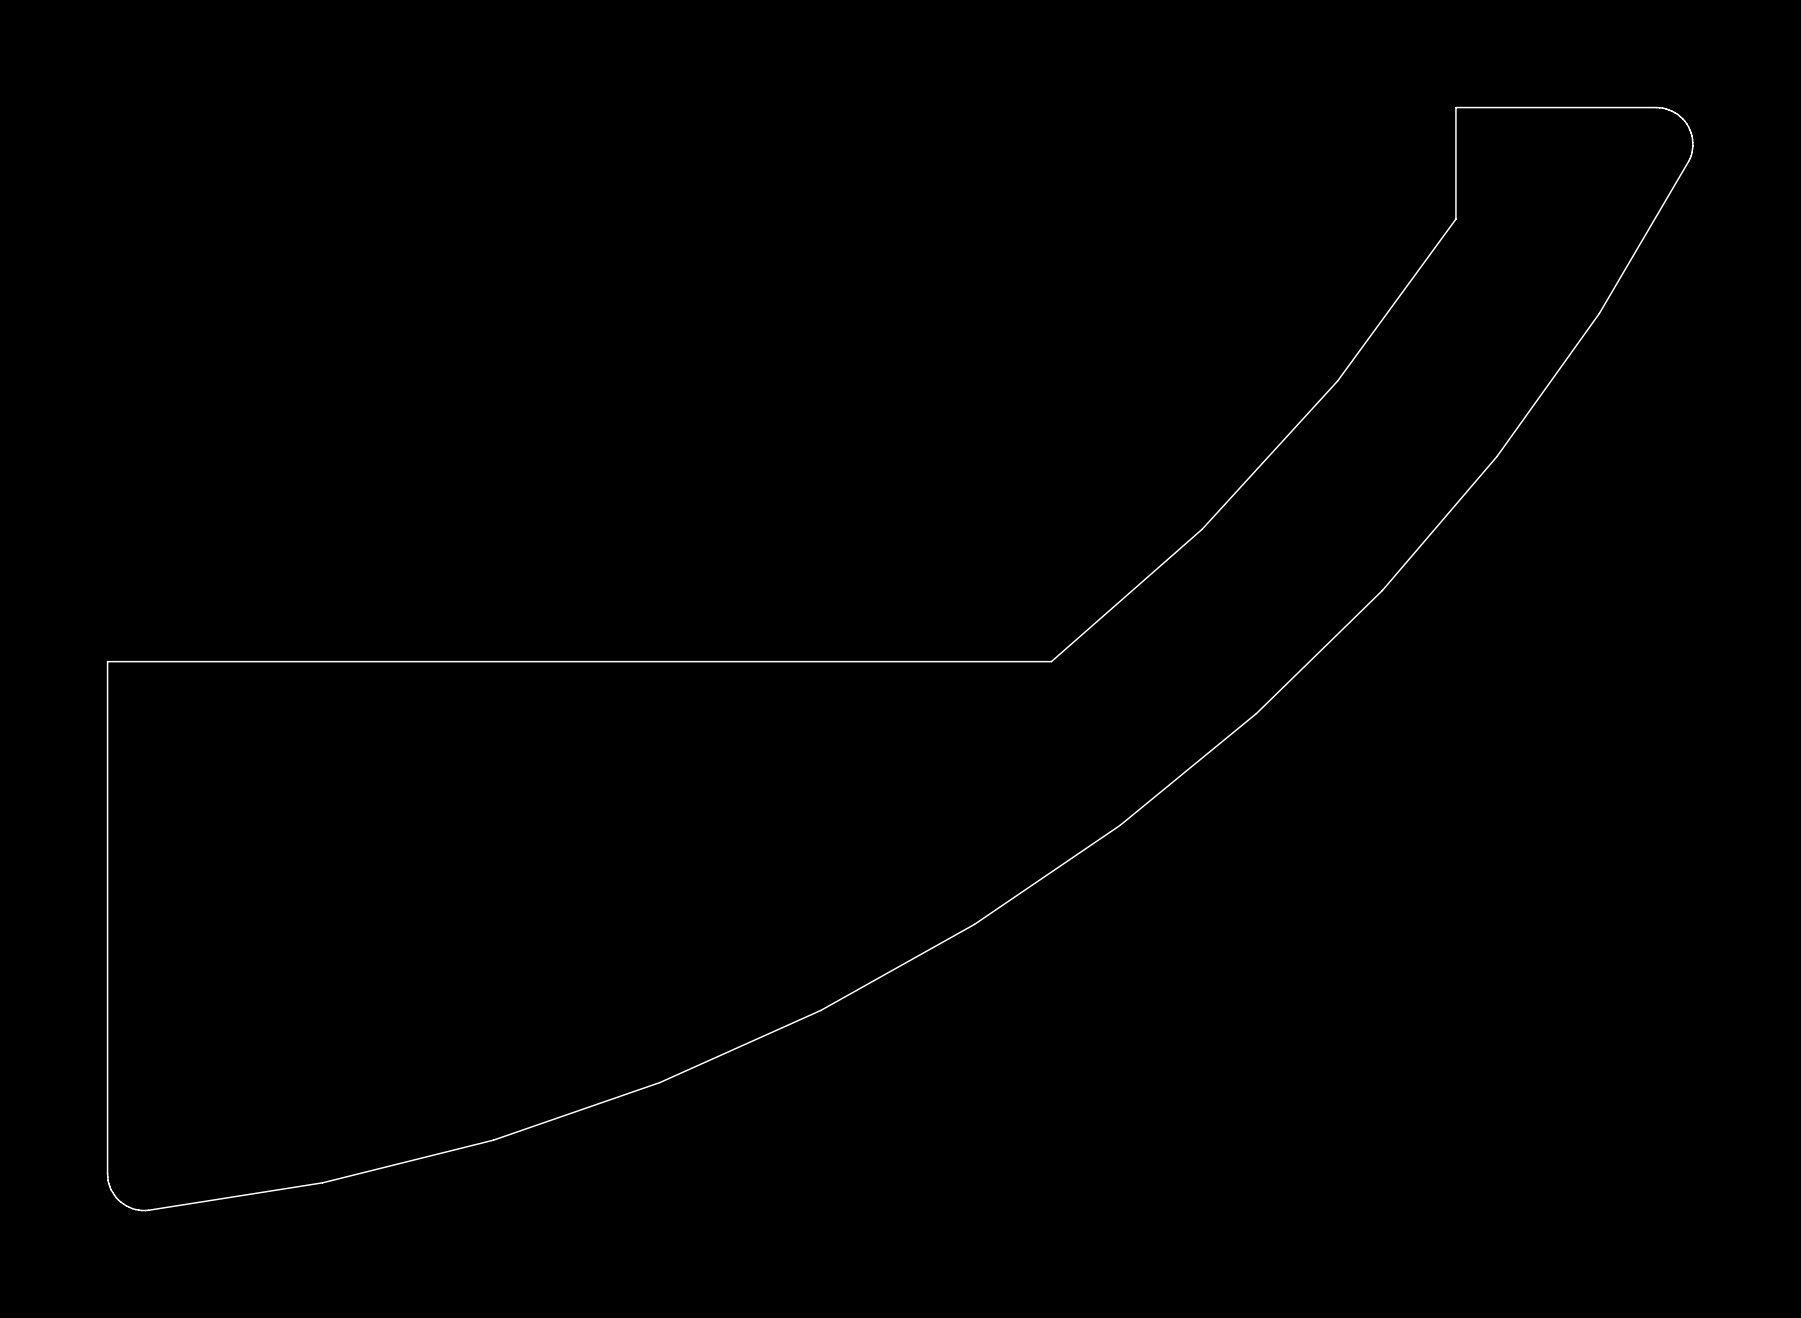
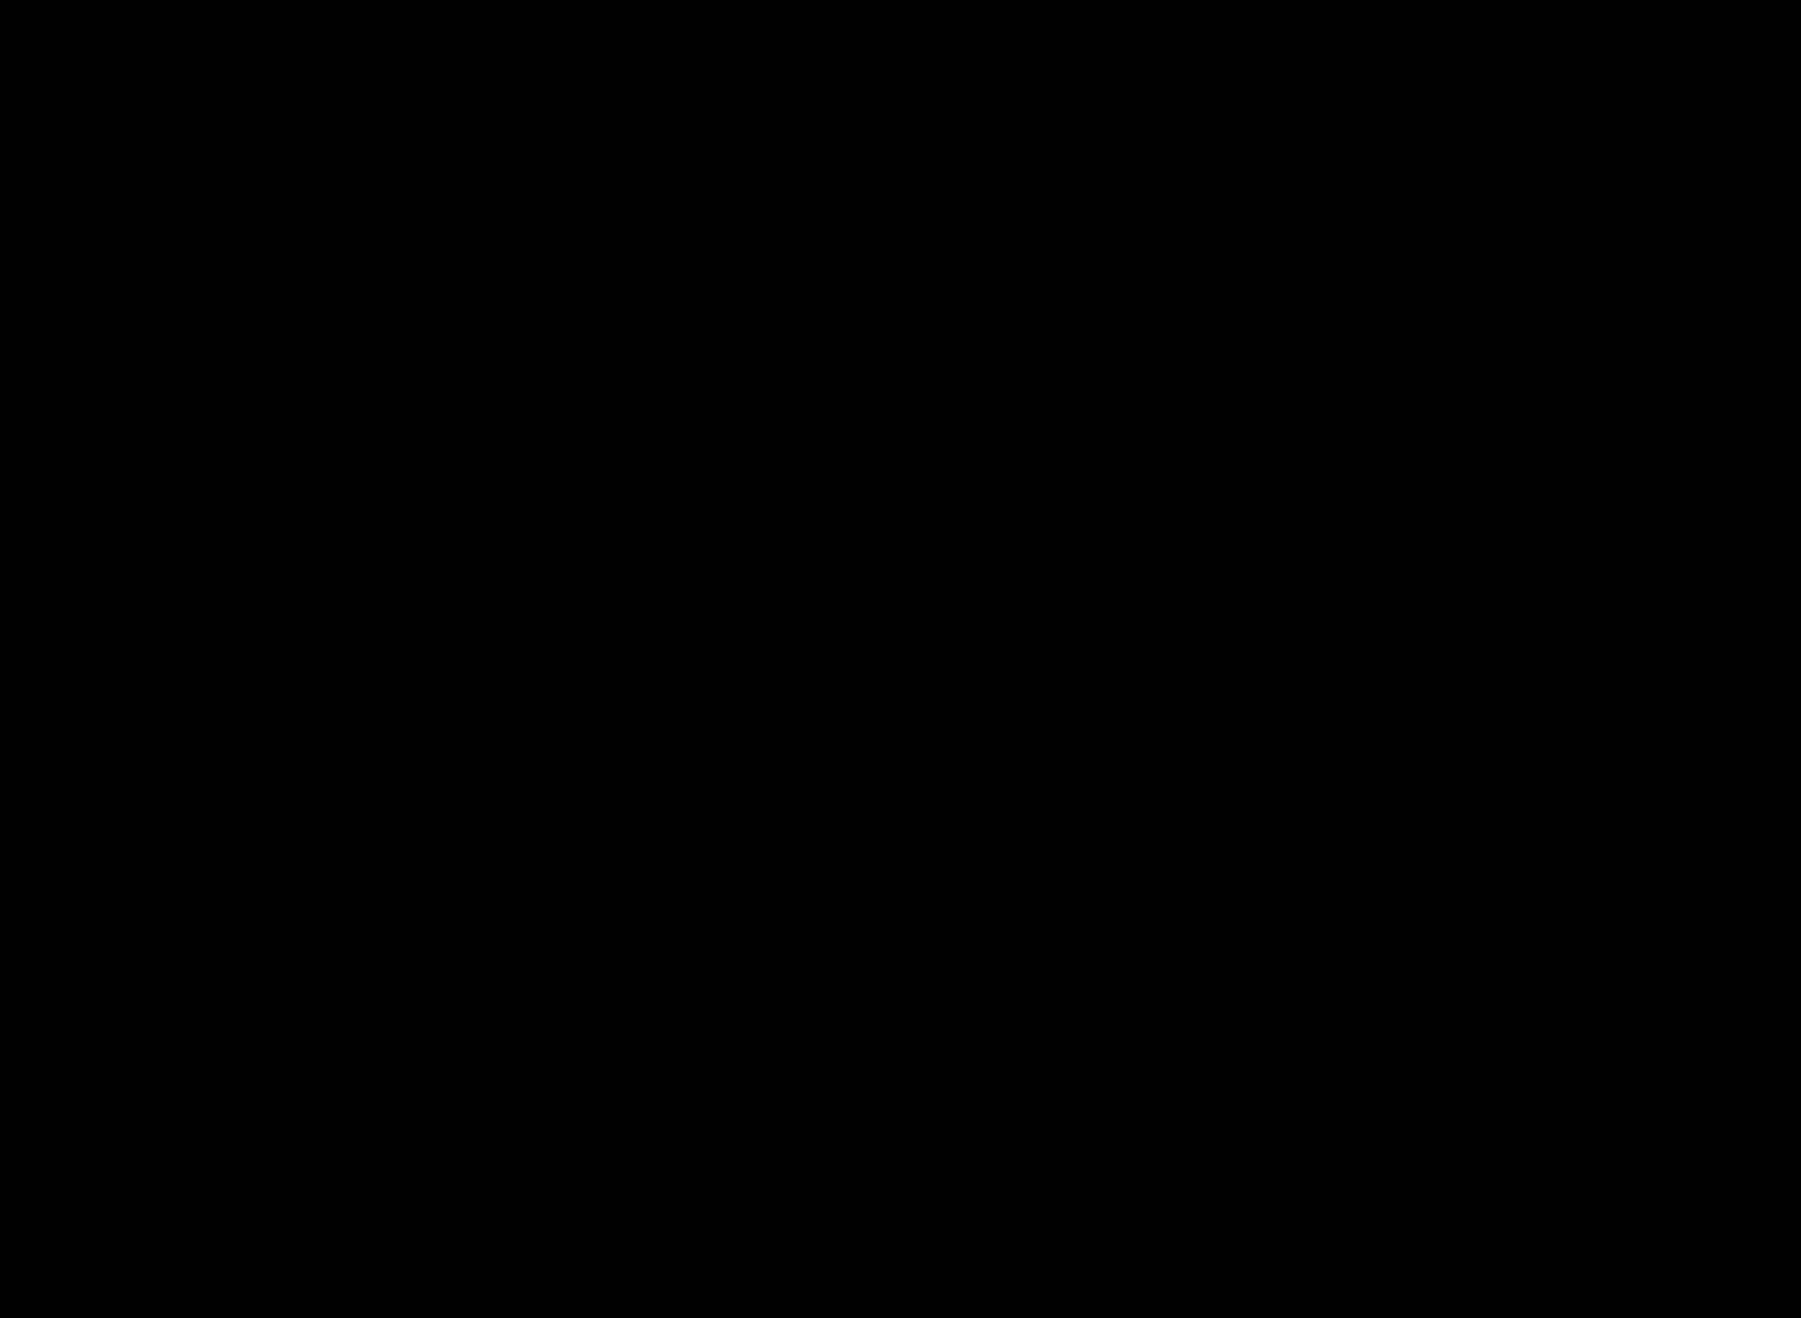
board edge: (1455, 107) (1662, 108) (1677, 114) (1686, 123) (1692, 136) (1692, 152) (1688, 161) (1599, 313) (1496, 456) (1382, 590) (1256, 713) (1120, 825) (974, 924) (820, 1010) (659, 1082) (493, 1140) (322, 1182) (145, 1210) (129, 1207) (116, 1197) (109, 1186) (107, 1173) (107, 661) (1051, 661) (1202, 529) (1337, 381) (1455, 219) (1455, 107) -> none

